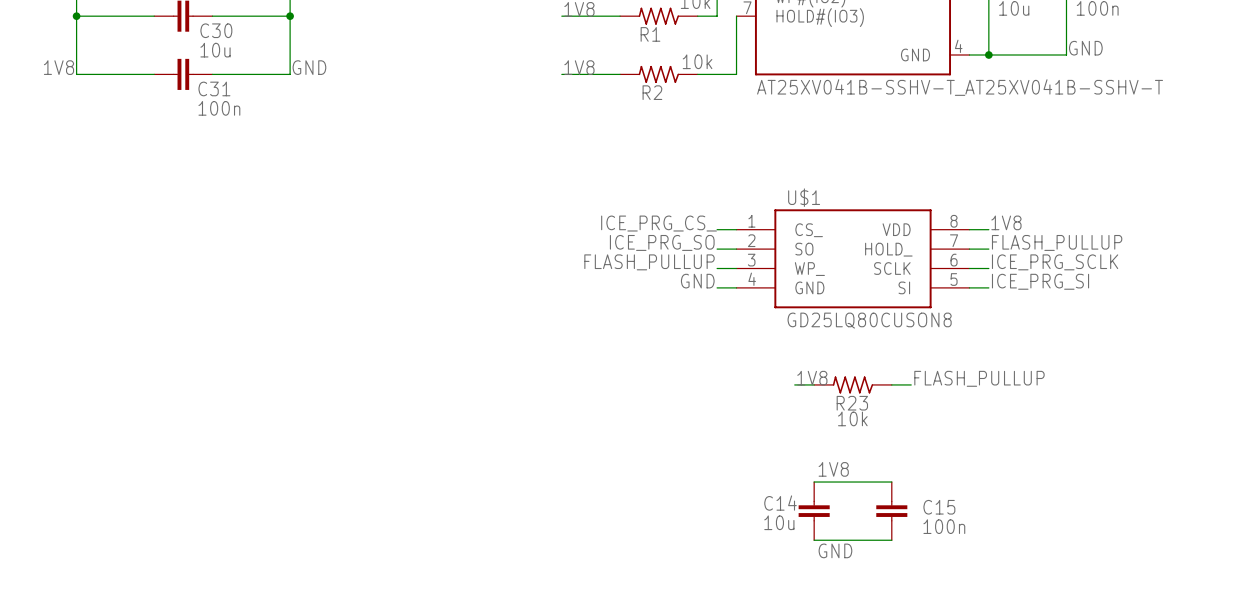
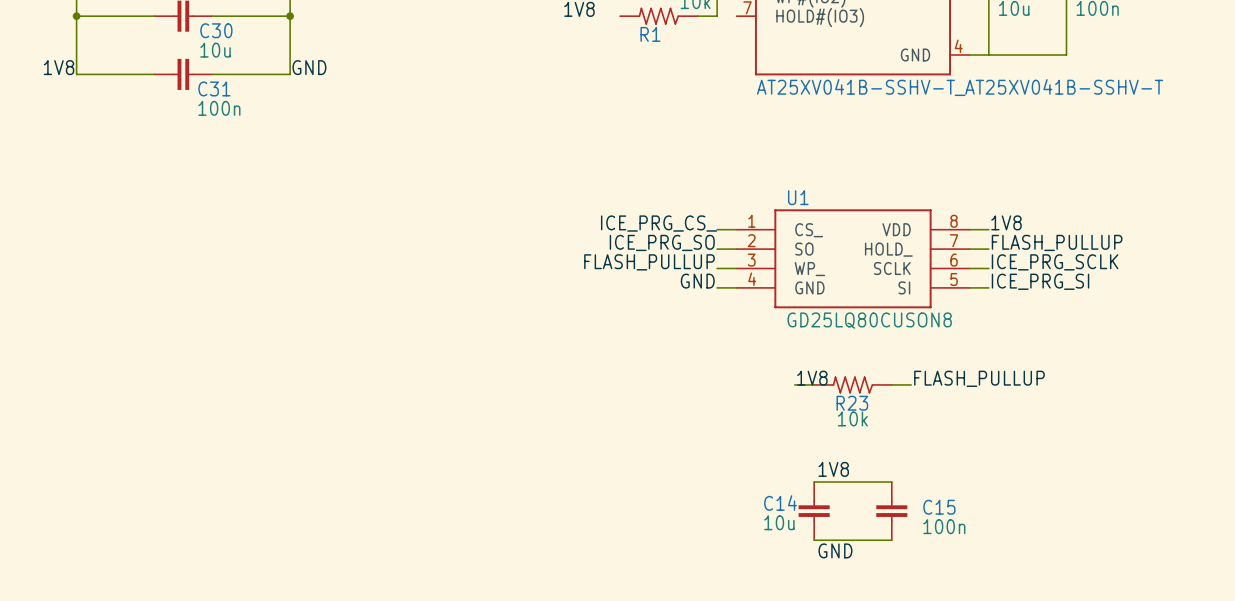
wire: (561, 16) (620, 16) -> none
wire: (736, 16) (736, 74) (697, 74) -> none
label: GND (1085, 48) -> none
junction: (988, 54) -> none
label: 1V8 (579, 67) -> none
wire: (561, 74) (620, 74) -> none
R2: 10k (658, 74) -> none
U$1 name: U$1 (804, 197) -> U1 (798, 197)

